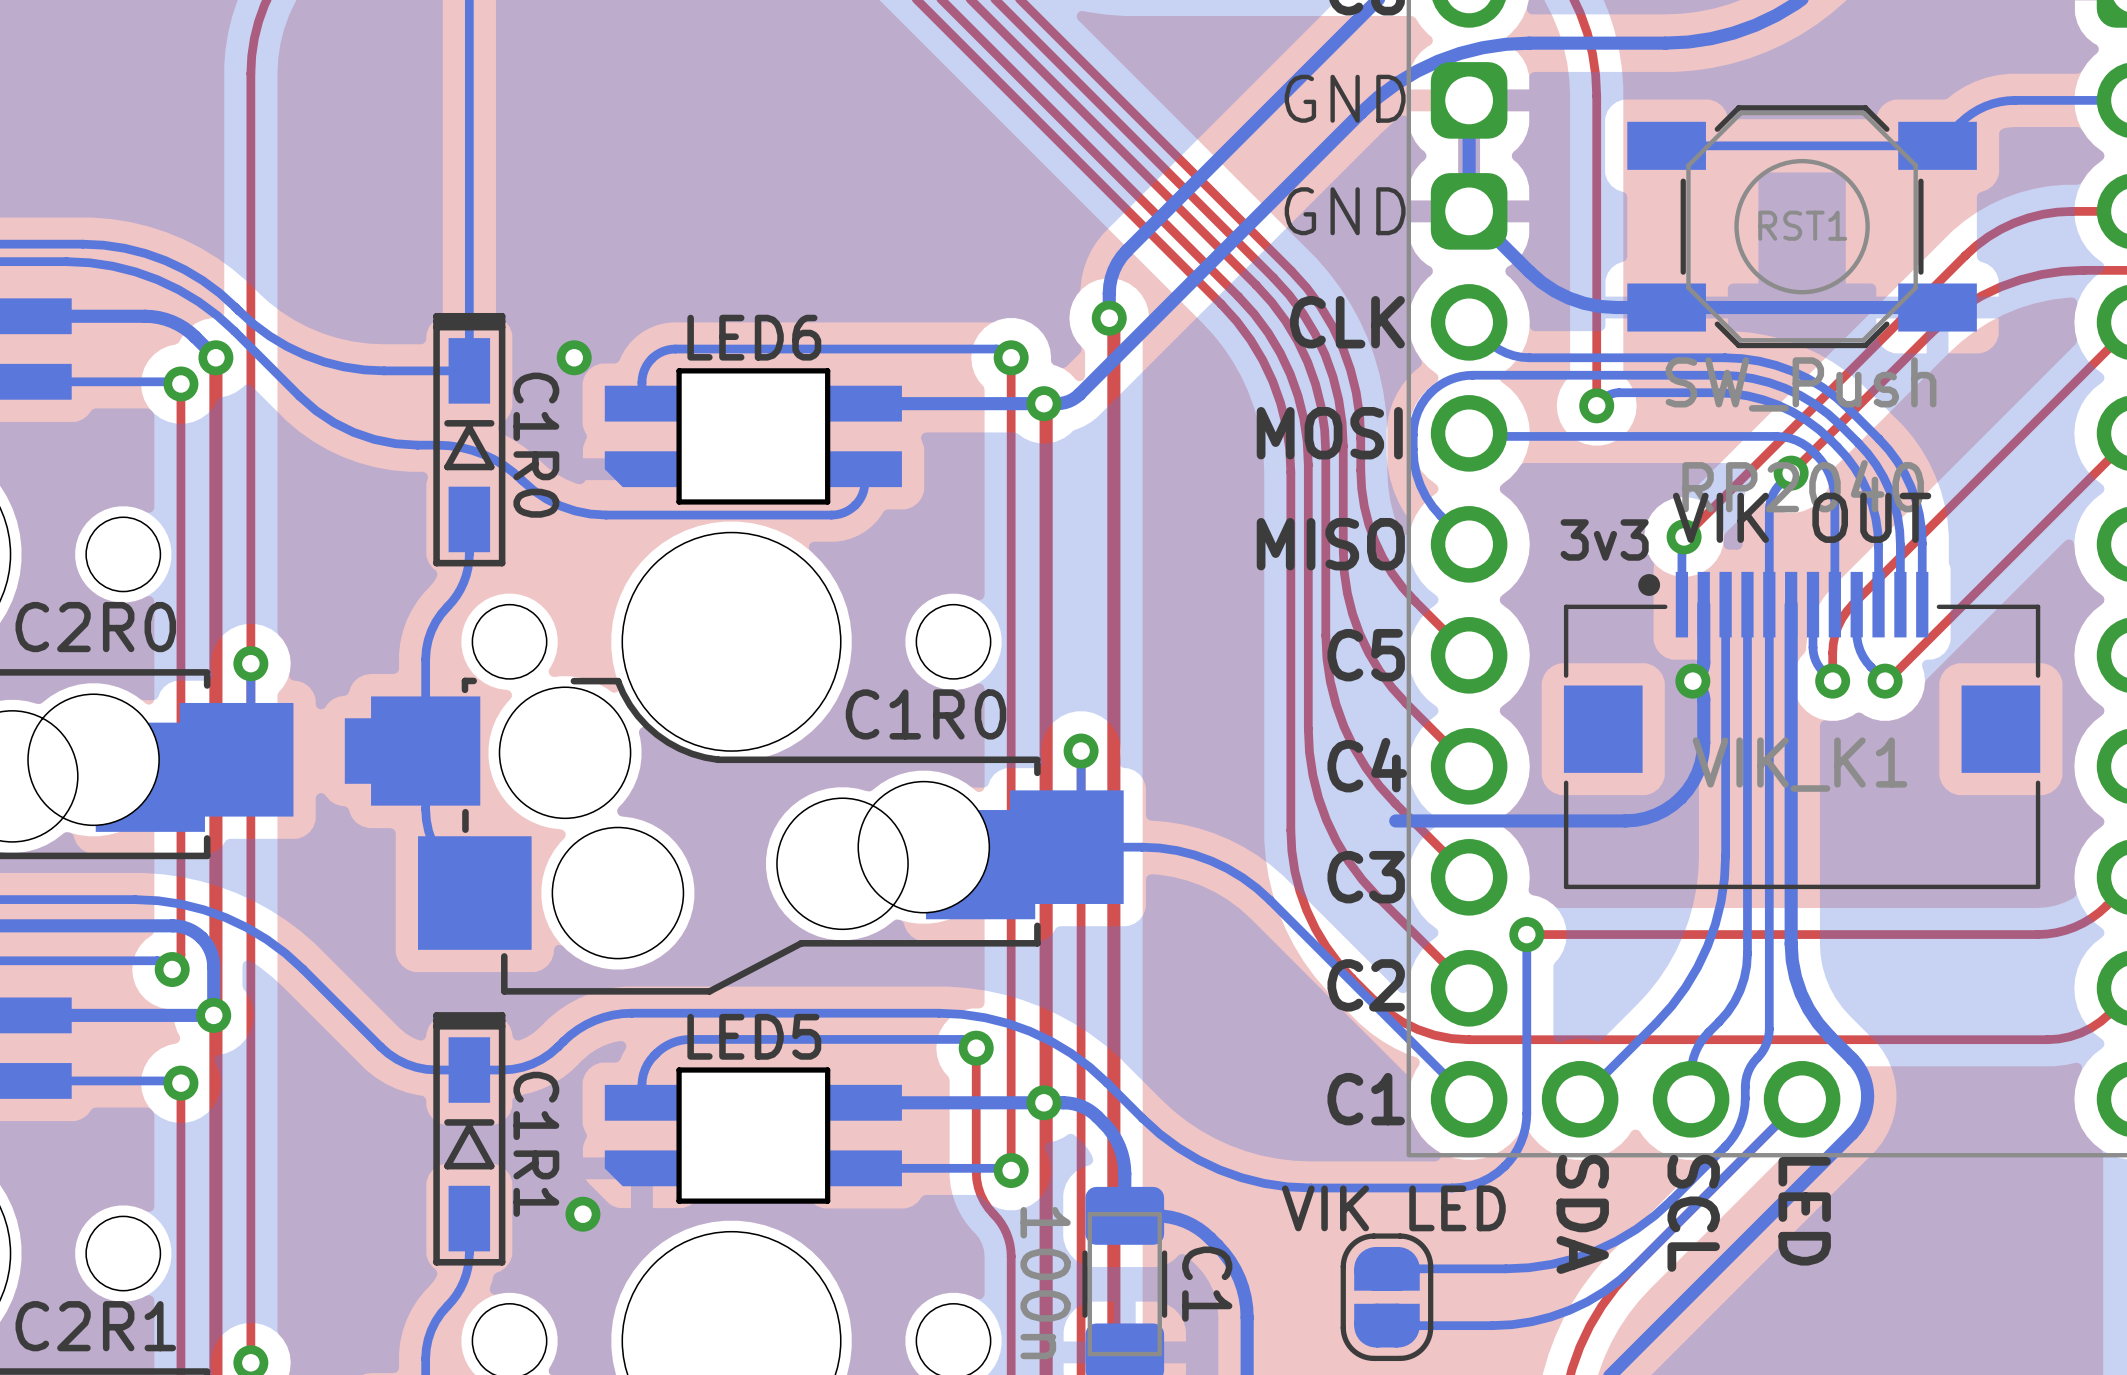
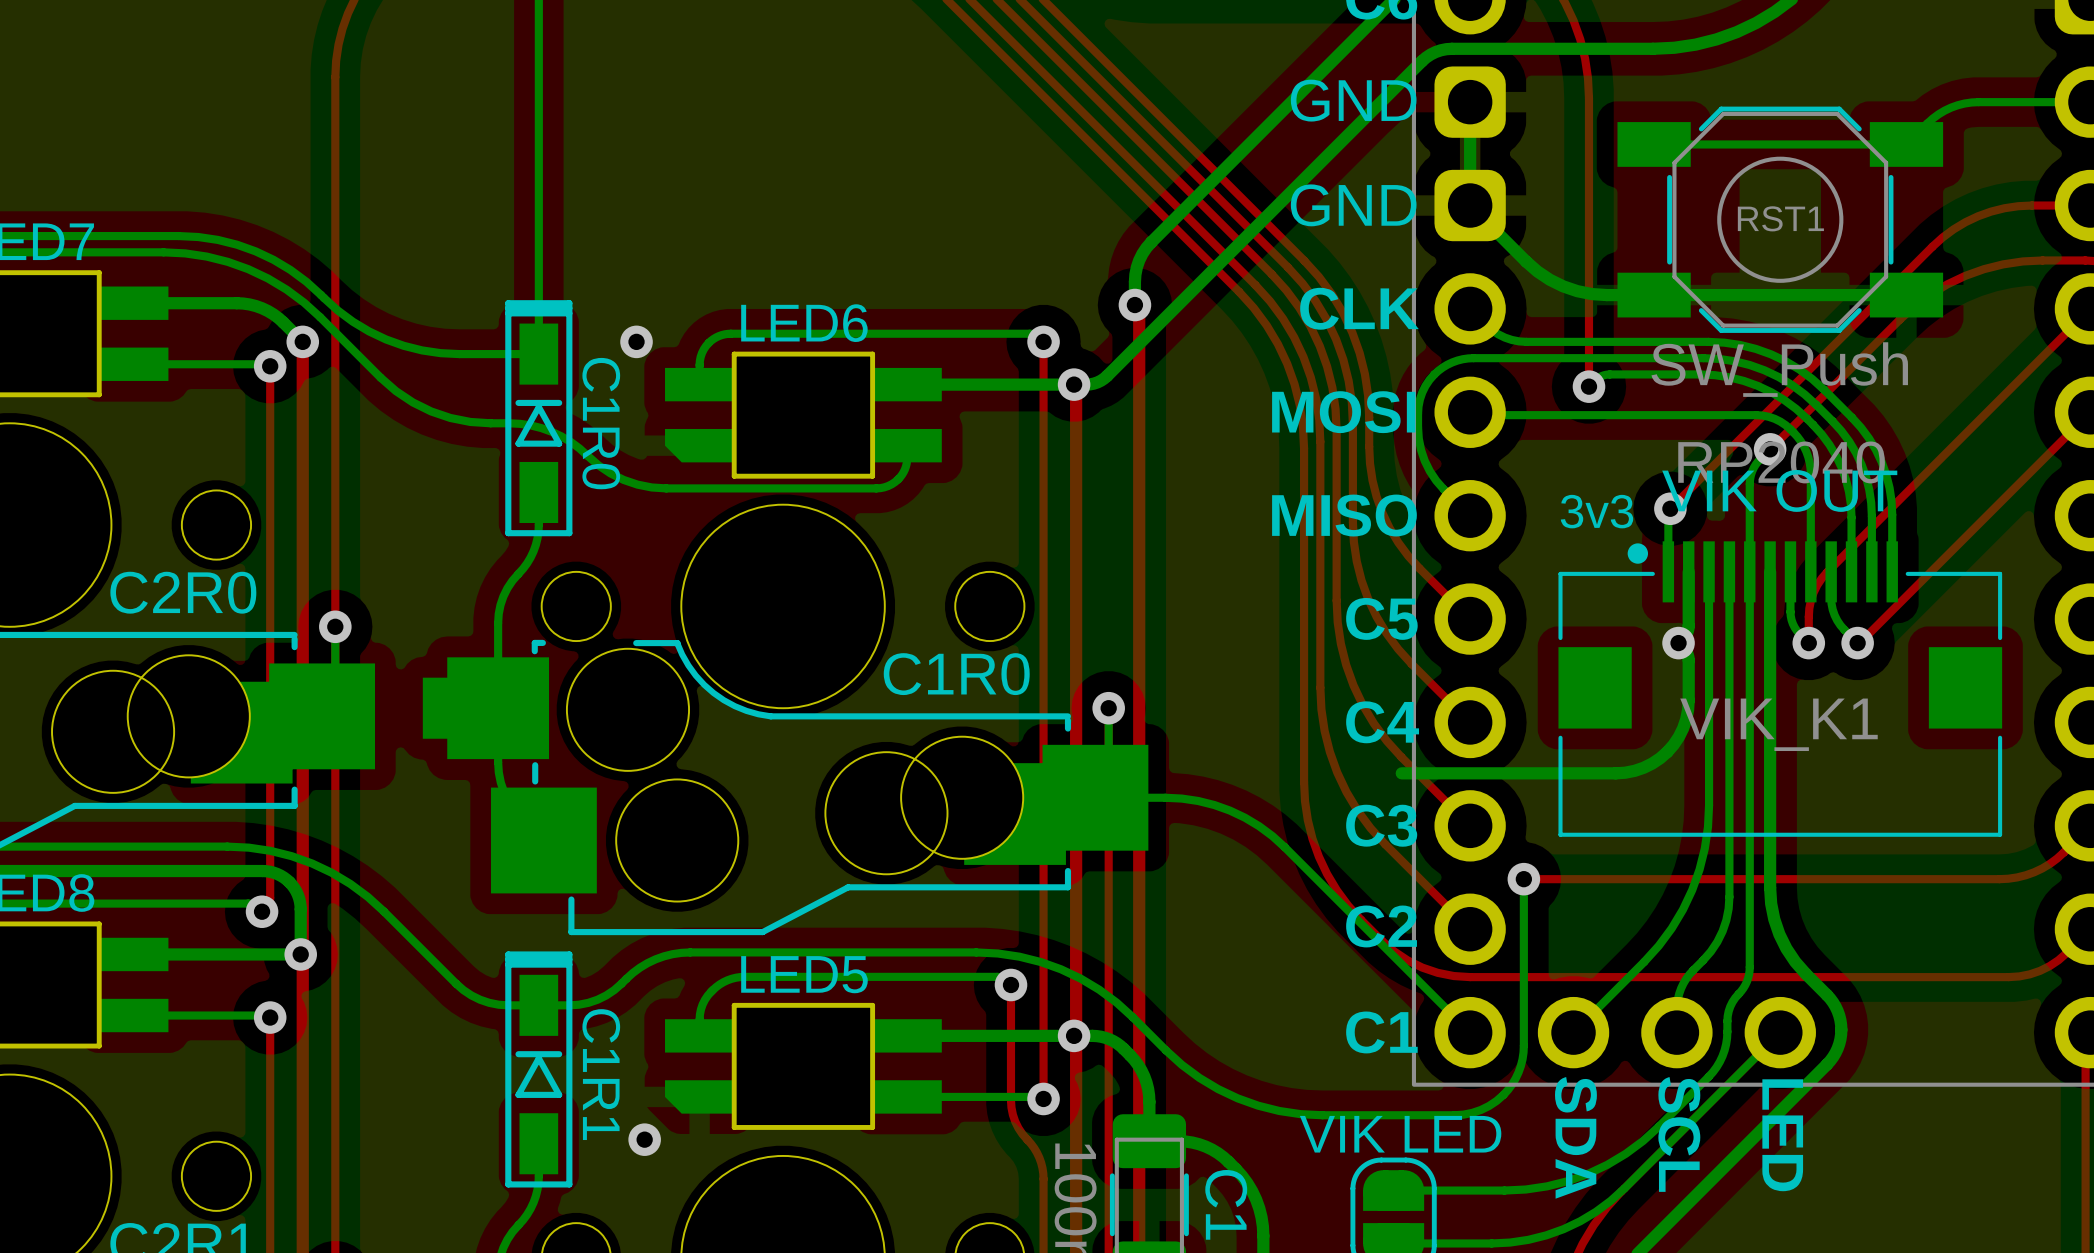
bottom track: (1529, 43) (1482, 47) (1438, 61) (1397, 83) (1361, 112) -> (1526, 48) (1451, 48) (1435, 52) (1421, 61) (1369, 113)

